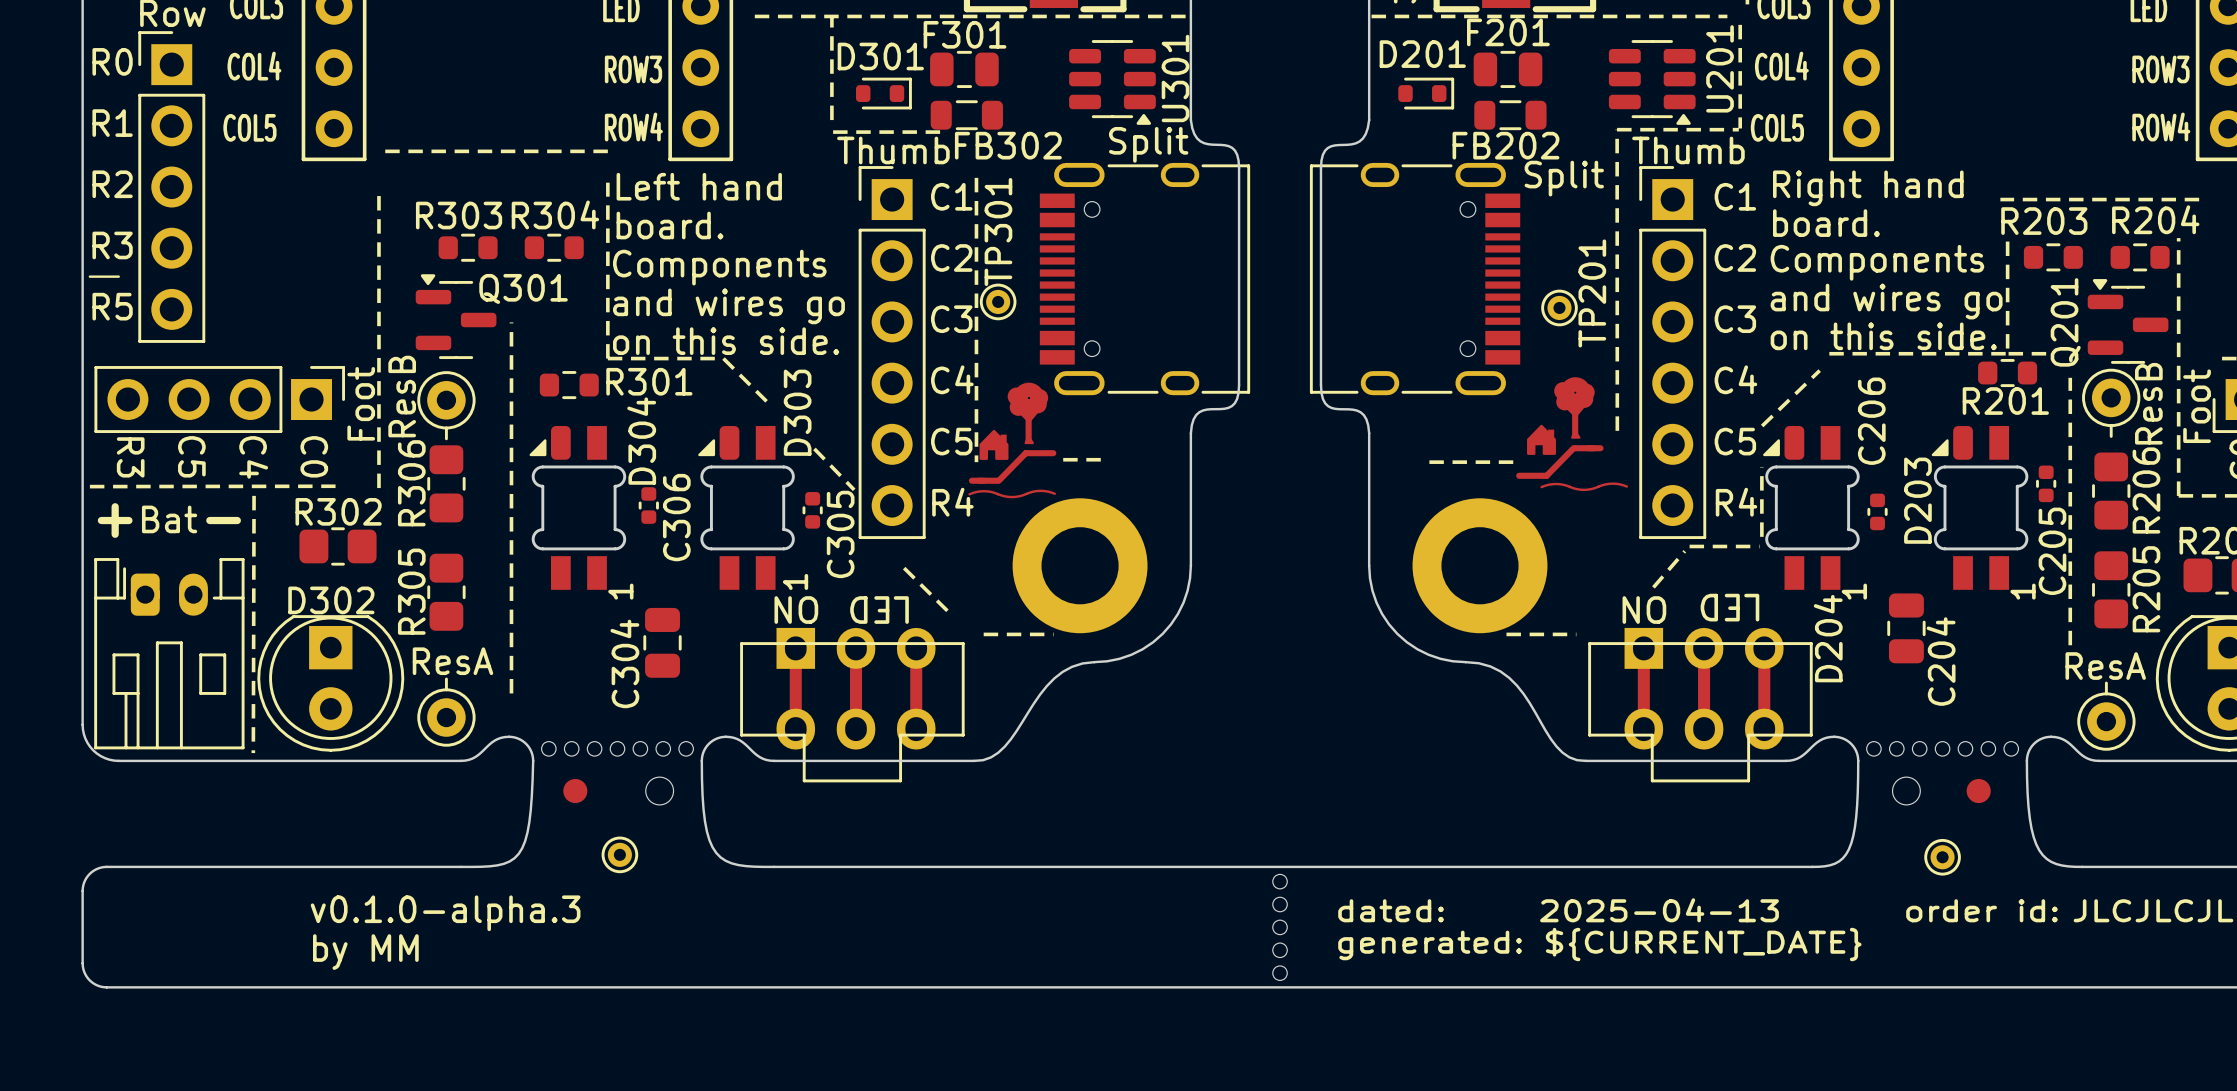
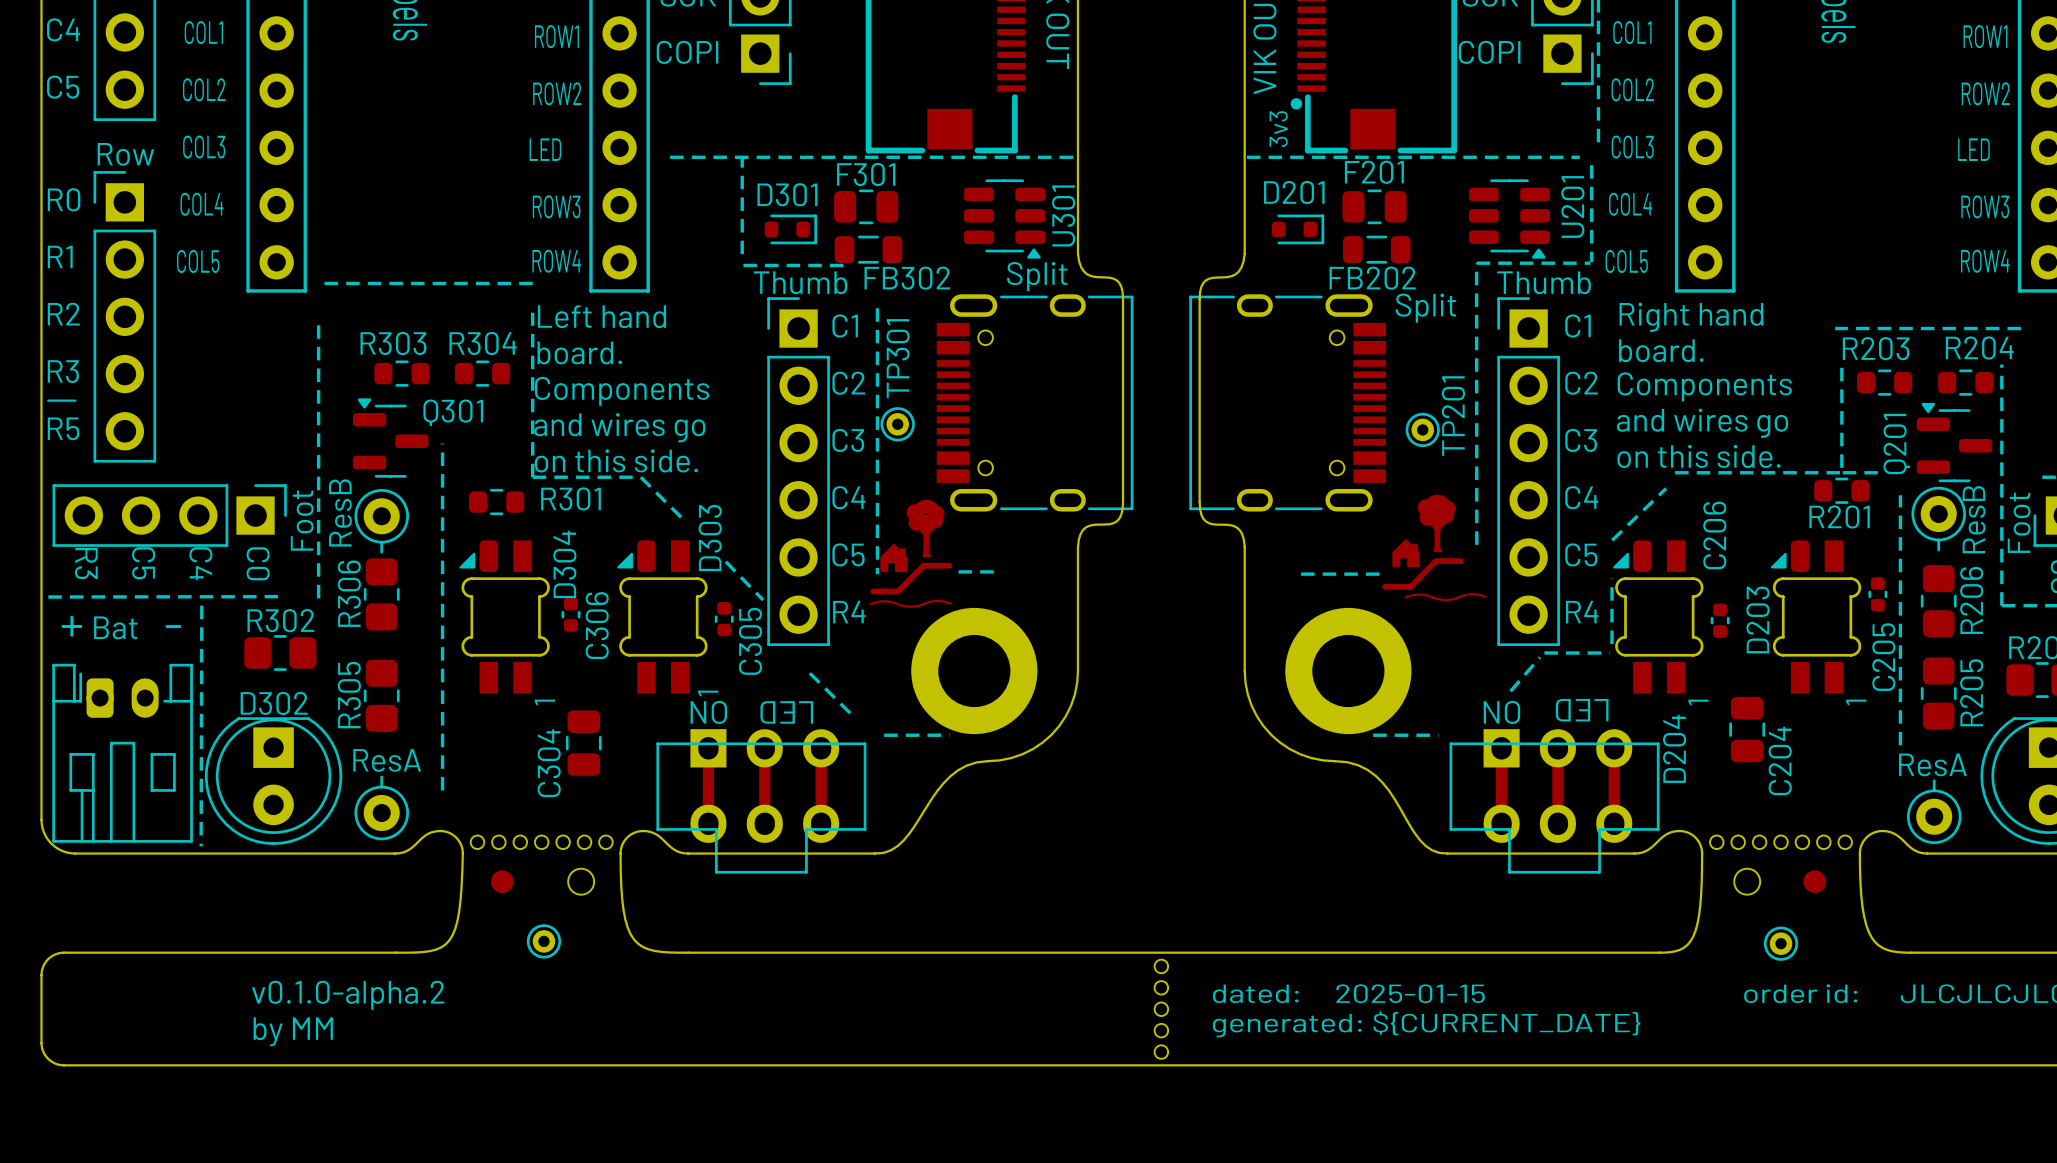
text: dated: 2025-04-13 (1558, 910) -> dated: 2025-01-15 (1348, 993)
text: v0.1.0-alpha.3 (445, 913) -> v0.1.0-alpha.2 (348, 995)

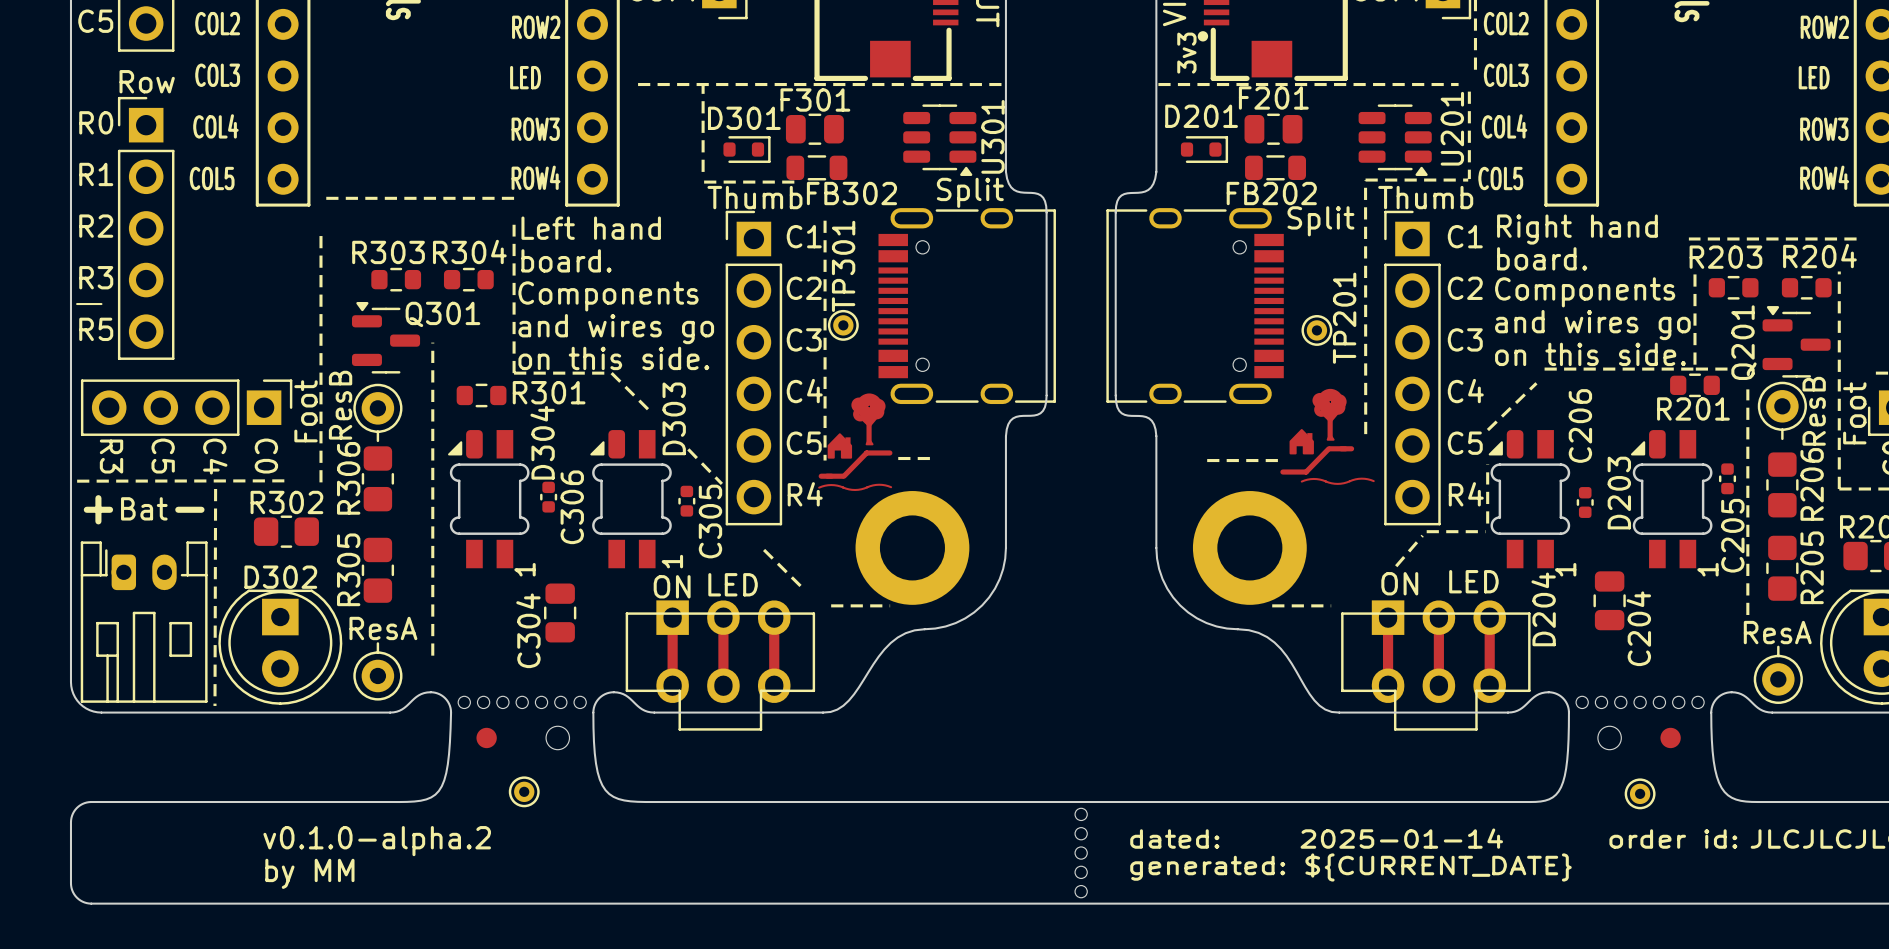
part text rotation: 0° (1582, 710) -> 180° (1473, 581)
part text rotation: 0° (708, 712) -> 180° (672, 586)
part text rotation: 0° (786, 712) -> 180° (733, 584)
part text rotation: 0° (1501, 712) -> 180° (1399, 583)
text: dated: 2025-01-15 (1348, 993) -> dated: 2025-01-14 (1316, 838)

